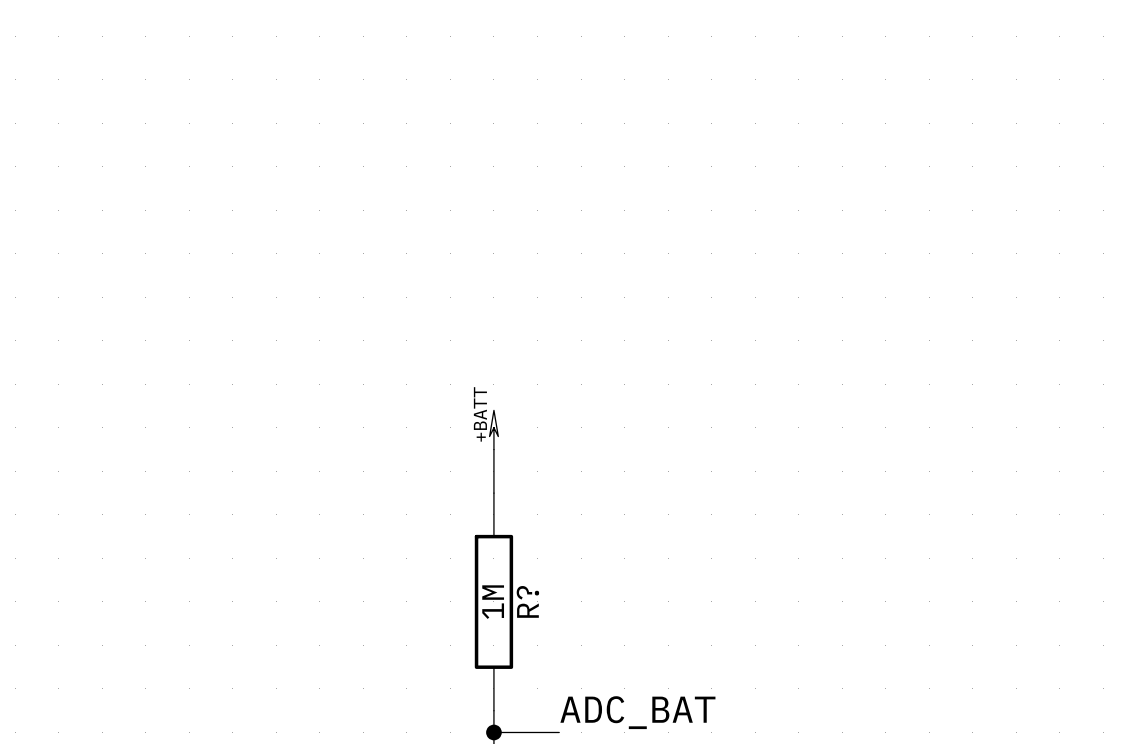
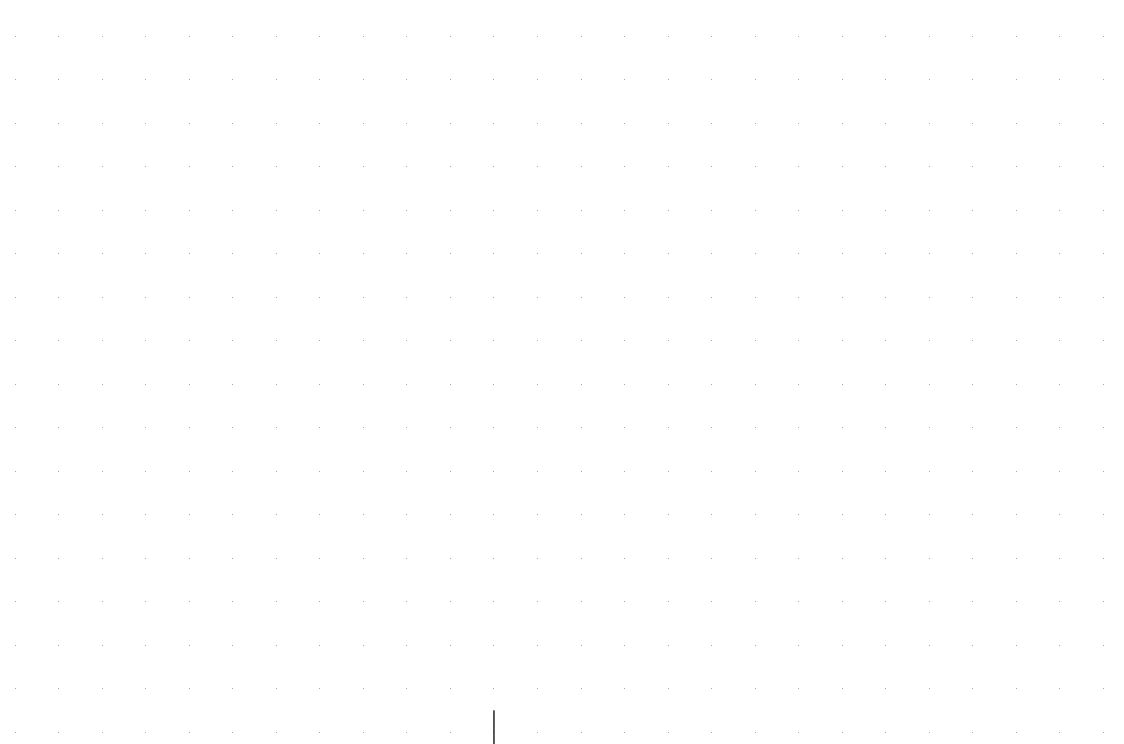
power symbol: +BATT (493, 429) -> none
wire: (493, 449) (493, 493) -> none
R?: 1M (493, 601) -> none
label: ADC_BAT (637, 712) -> none
wire: (493, 732) (559, 732) -> none
junction: (493, 732) -> none

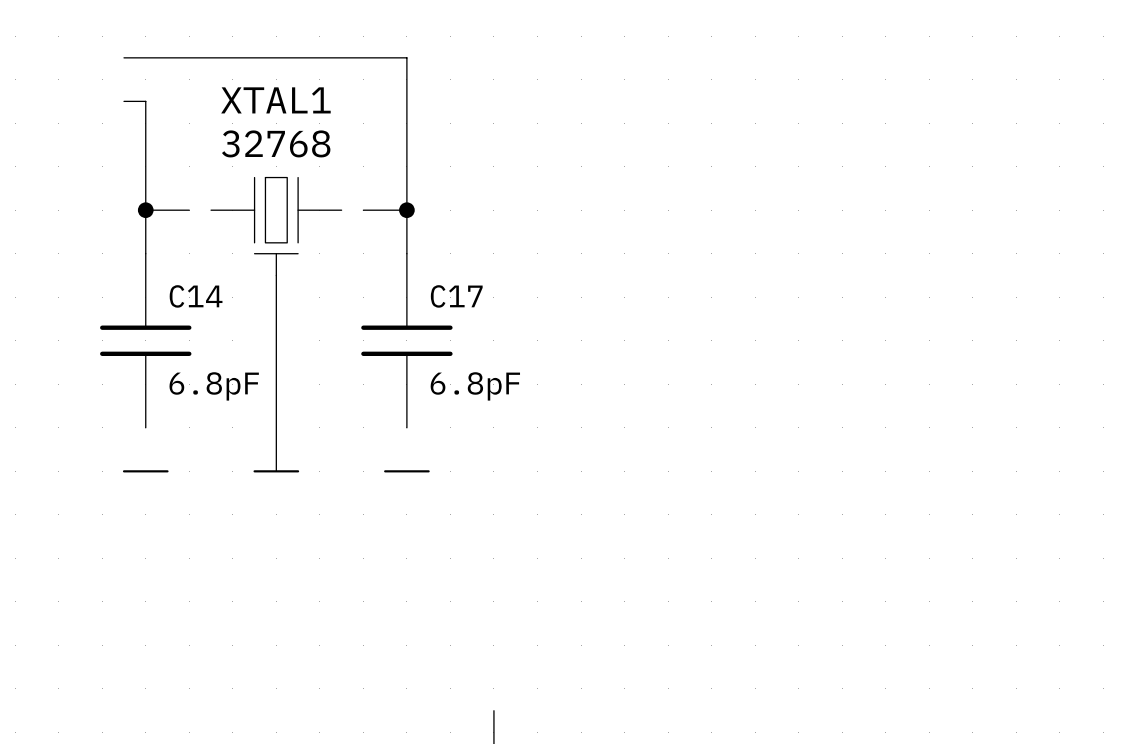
wire: none -> (123, 57) (406, 57) (406, 253)
wire: none -> (123, 101) (145, 101) (145, 253)
wire: none -> (145, 210) (189, 210)
junction: none -> (145, 210)
wire: none -> (363, 210) (406, 210)
junction: none -> (406, 210)
XTAL1: none -> 32768 (276, 226)
wire: none -> (276, 275) (276, 471)
C14: none -> 6.8pF (145, 340)
C17: none -> 6.8pF (406, 340)
power symbol: none -> (145, 471)
power symbol: none -> (276, 471)
power symbol: none -> (406, 471)

